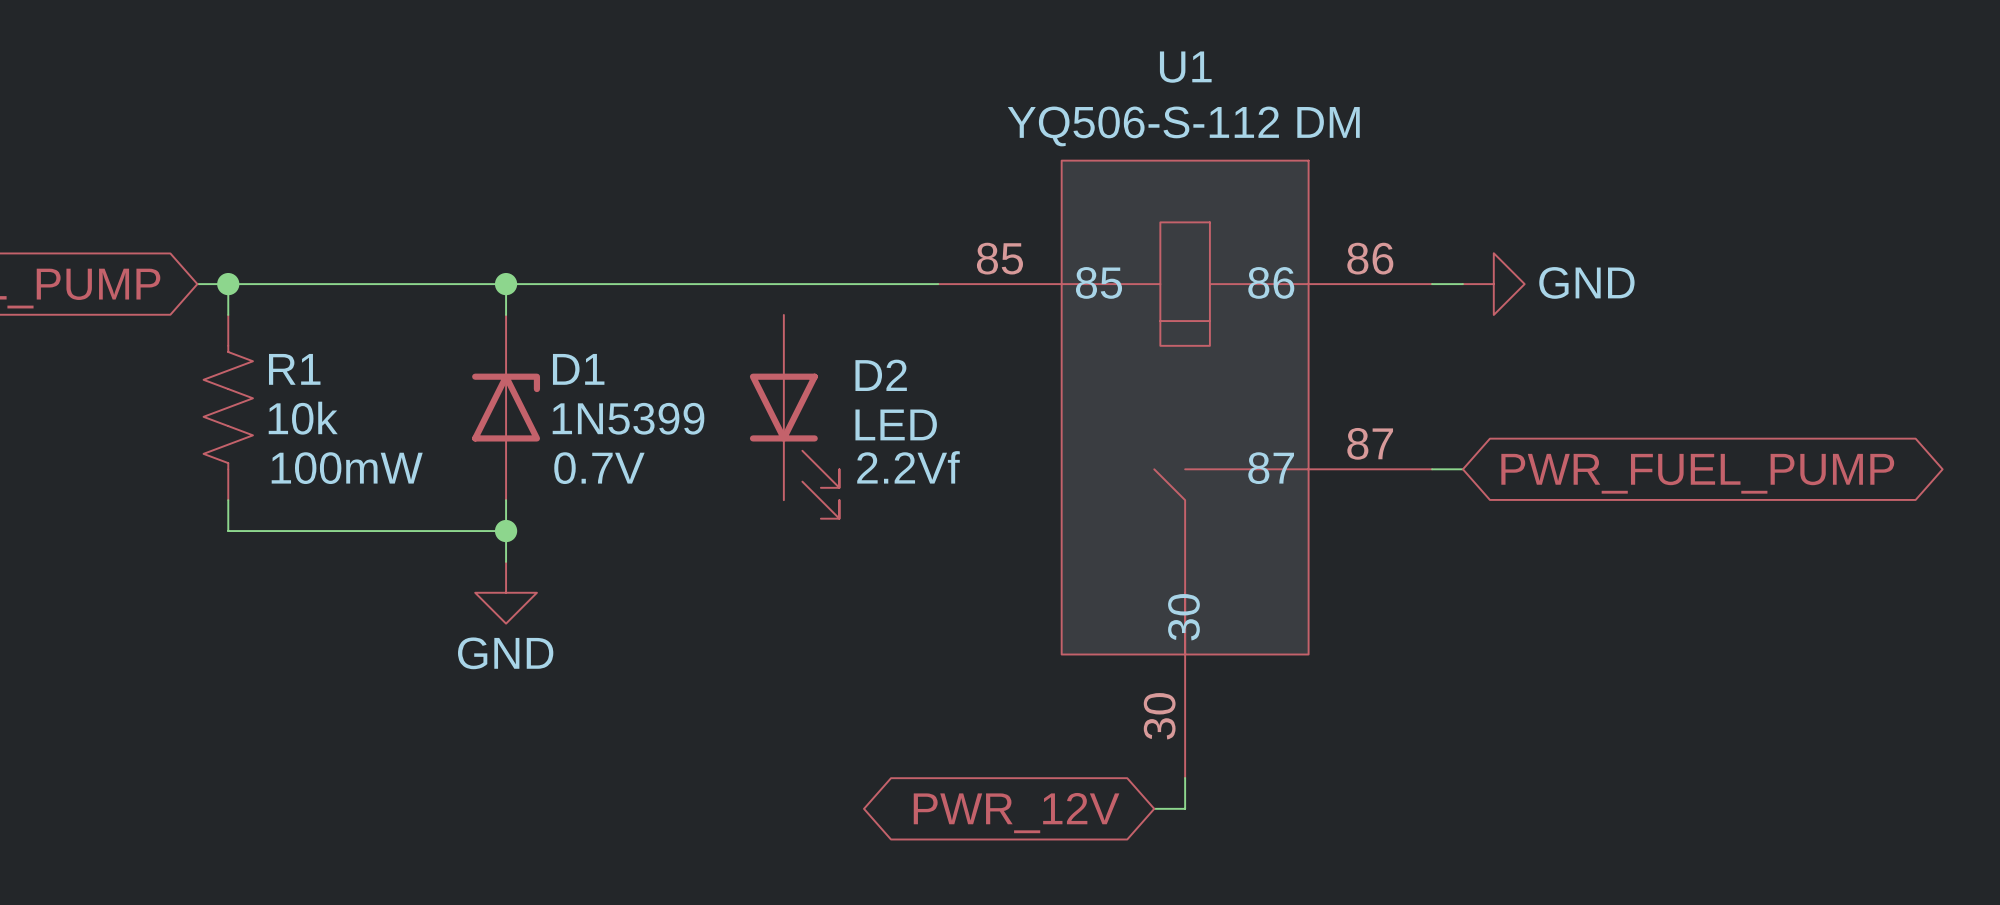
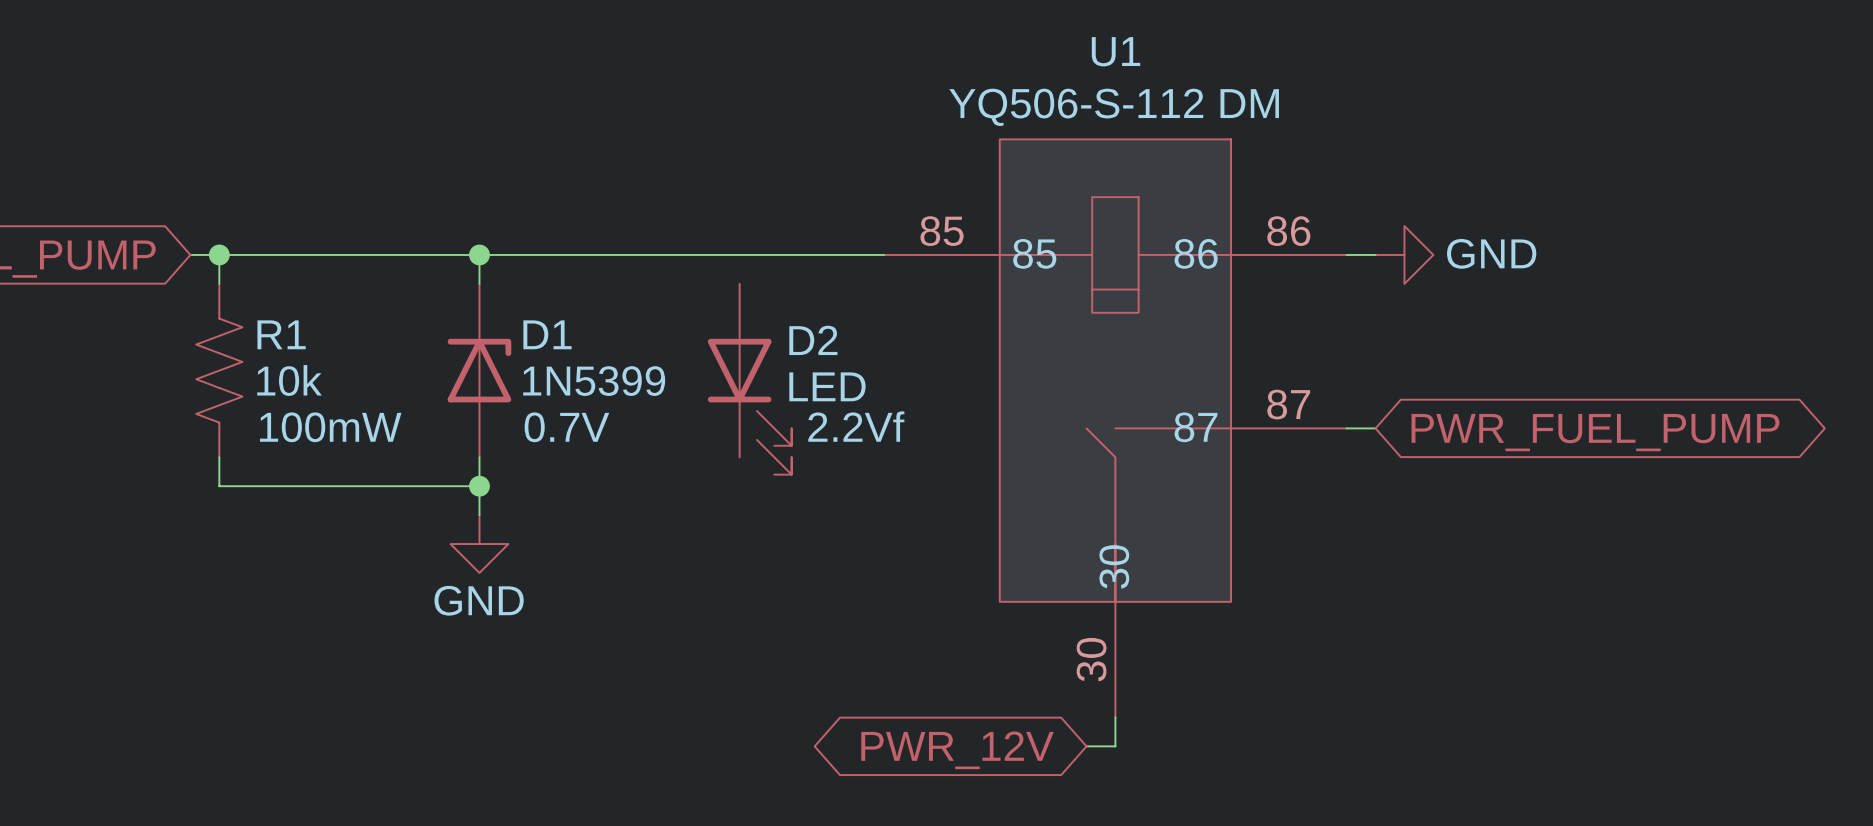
D2 name position: D2 (881, 375) -> D2 (813, 340)
D2 value position: LED (896, 424) -> LED (827, 386)

